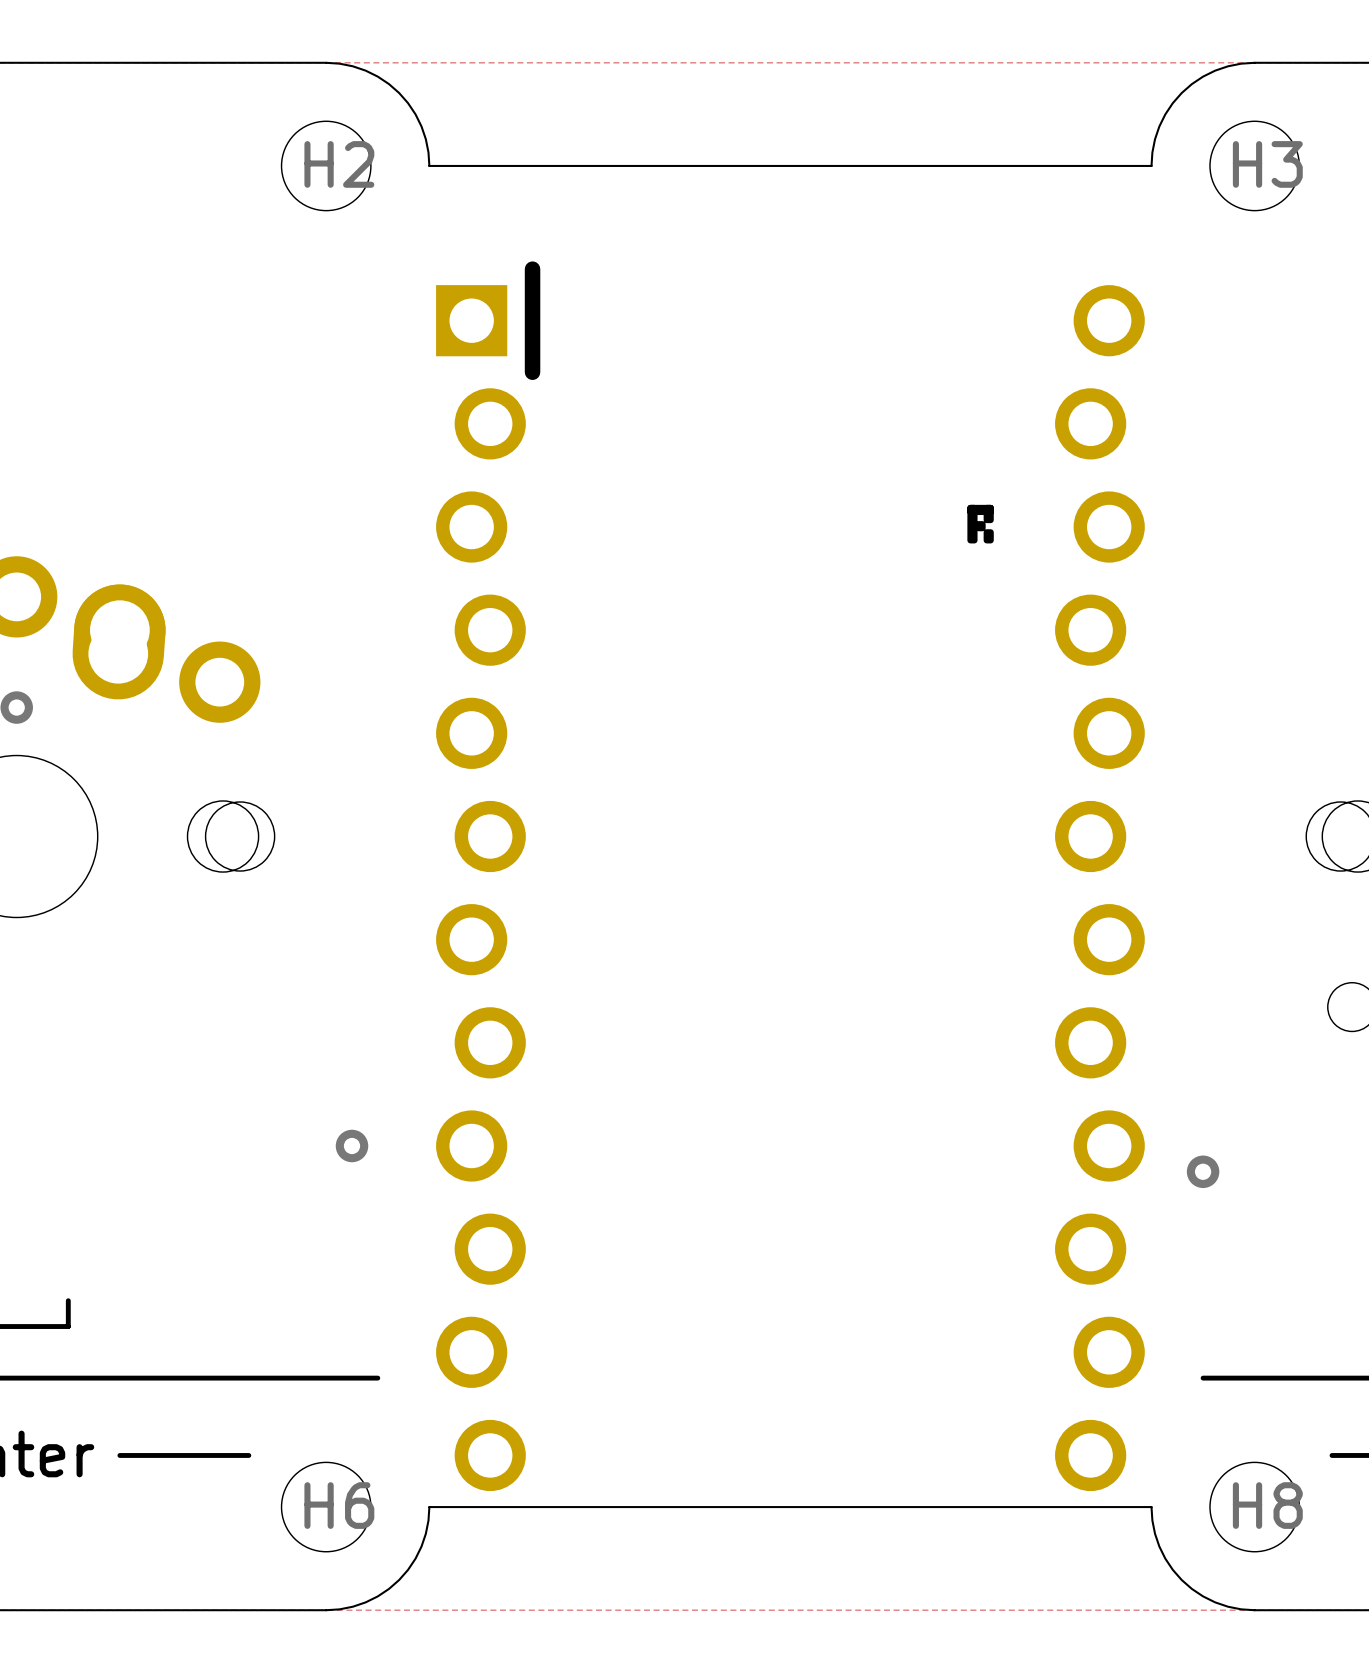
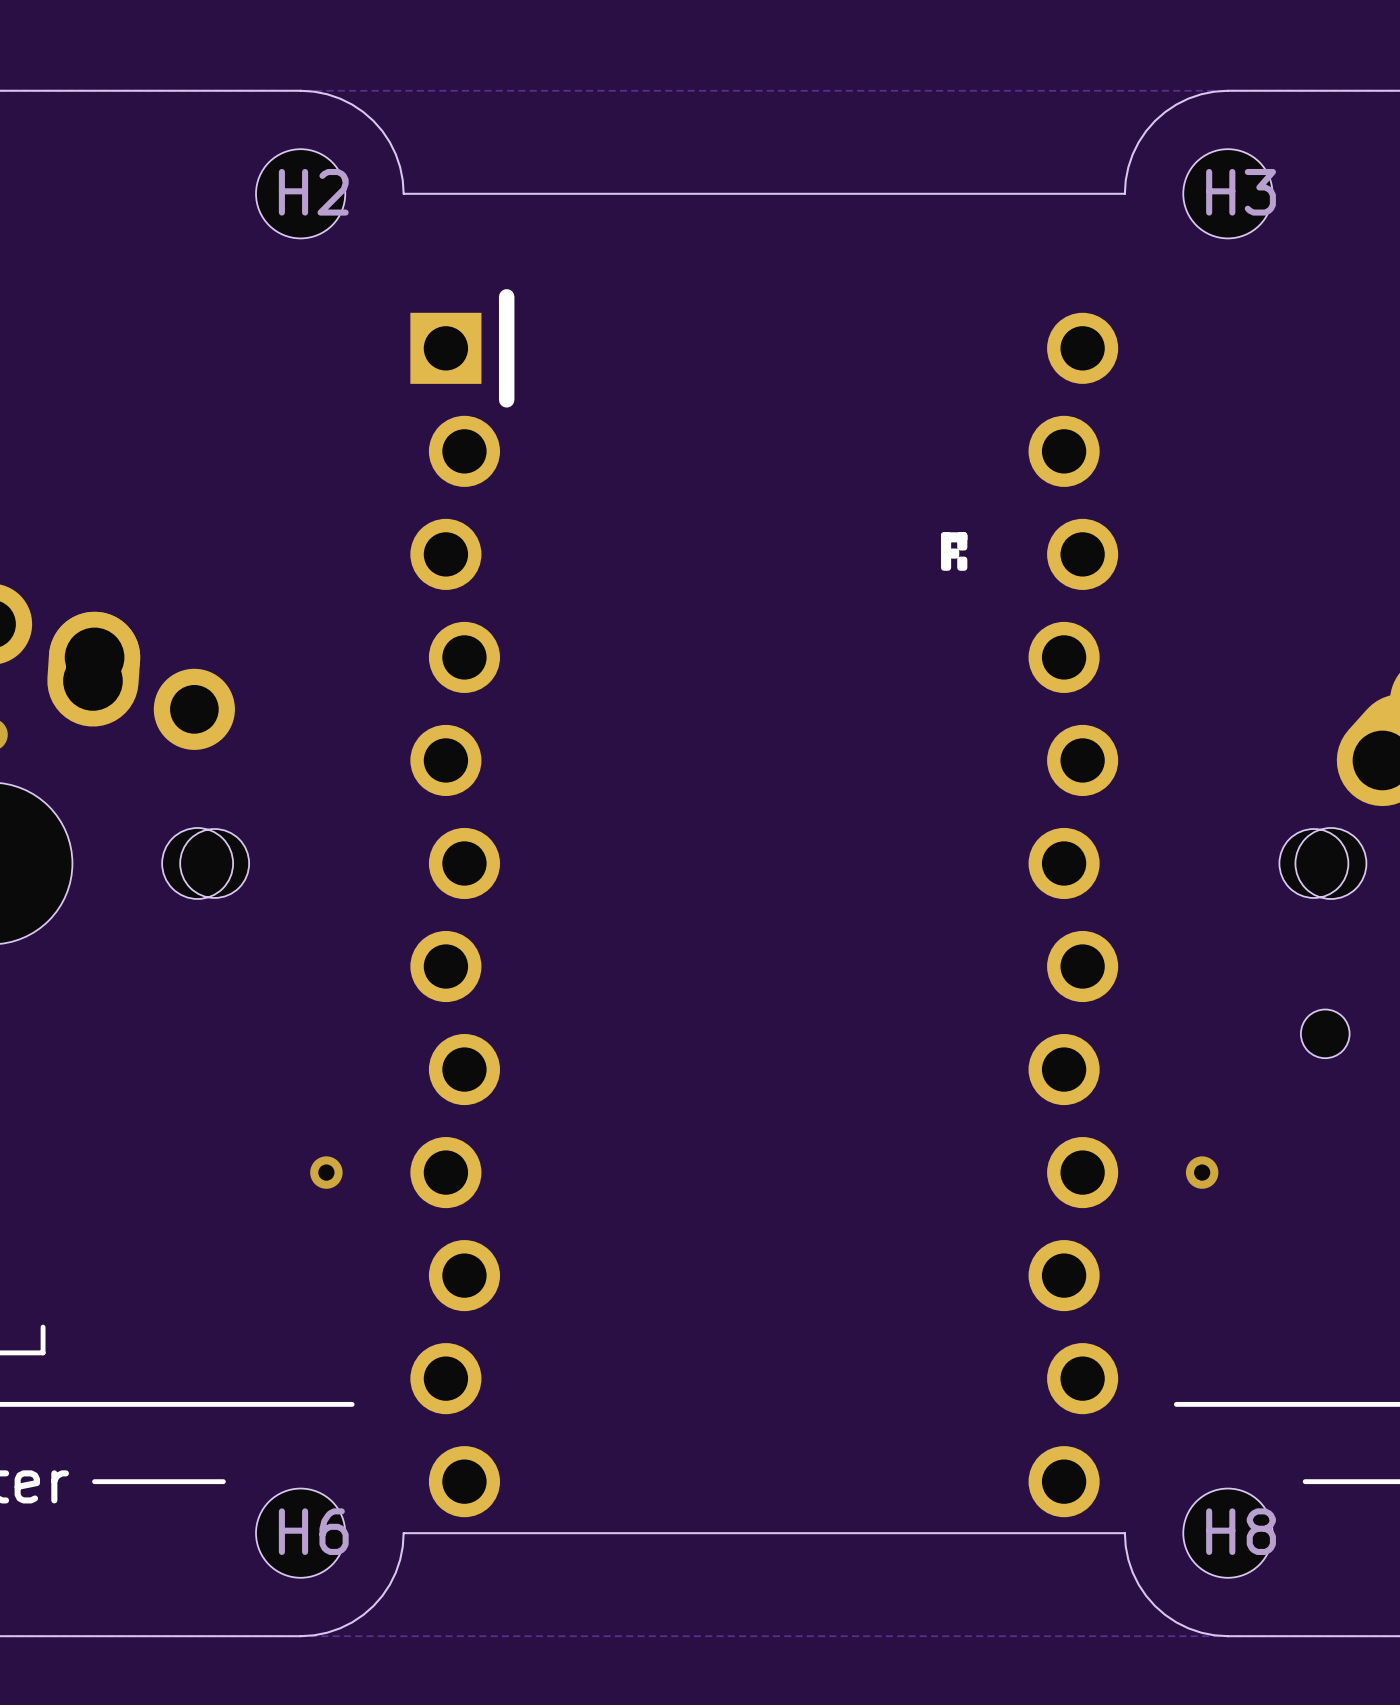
via position: (1203, 1171) -> (1202, 1172)

